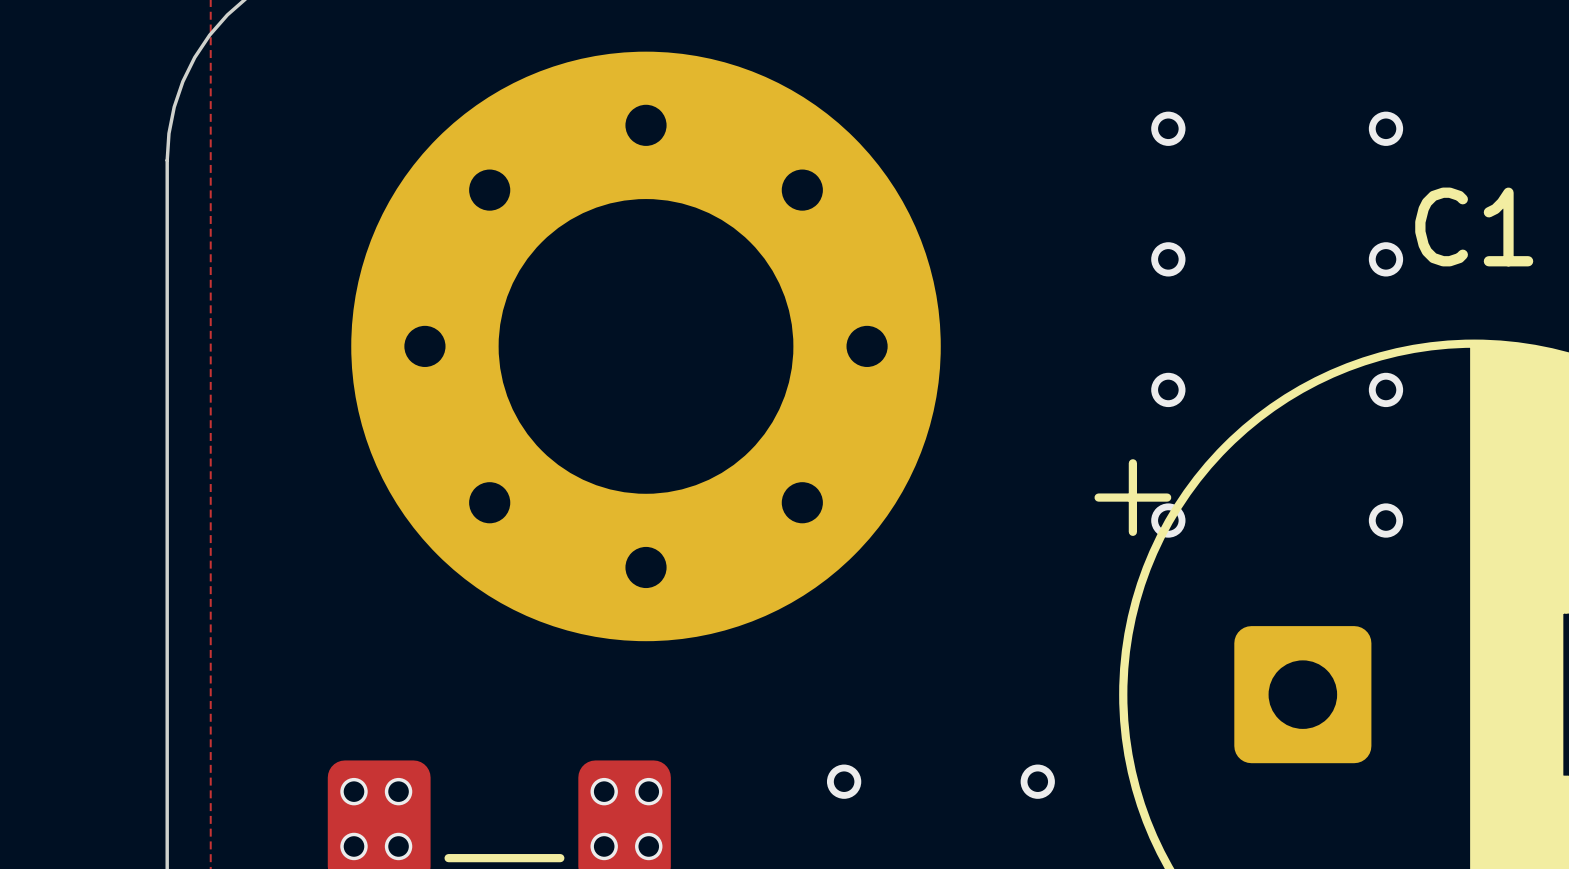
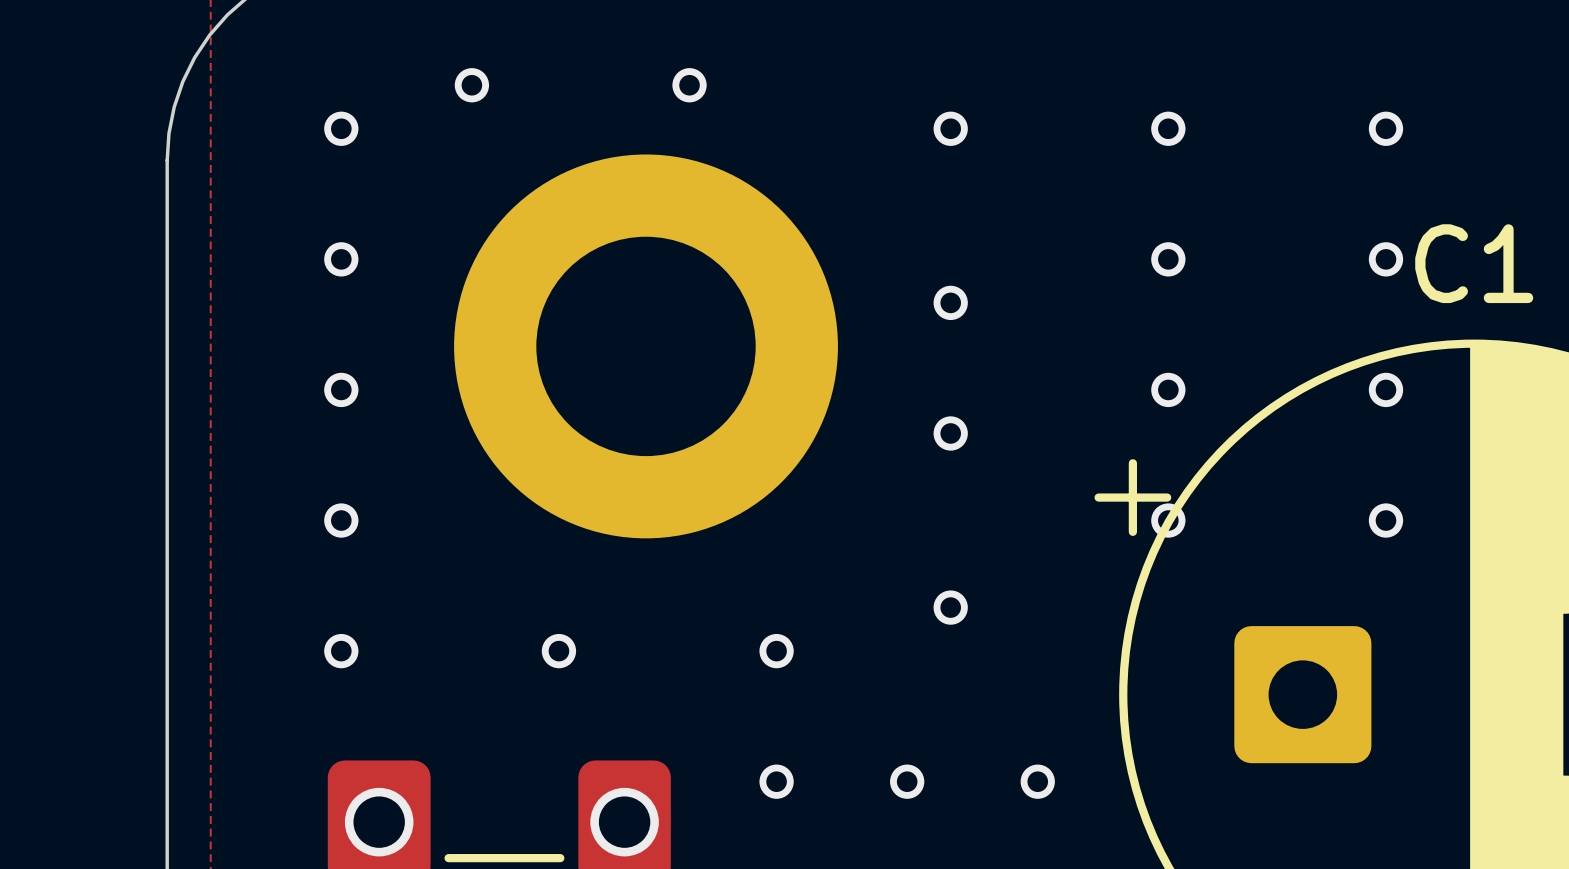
part footprint: [351, 51, 941, 642] -> [454, 154, 838, 539]
via: none -> (471, 85)
via: none -> (689, 85)
via: none -> (341, 128)
via: none -> (950, 128)
C1 name position: C1 (1474, 226) -> C1 (1474, 263)
via: none -> (341, 259)
via: none -> (950, 302)
via: none -> (341, 389)
via: none -> (950, 433)
via: none -> (341, 520)
via: none -> (950, 607)
via: none -> (341, 651)
via: none -> (558, 651)
via: none -> (776, 651)
via: none -> (776, 781)
via: (844, 781) -> none
via: none -> (907, 781)
via: (353, 791) -> none
via: (398, 791) -> none
via: (604, 791) -> none
via: (648, 791) -> none
via: none -> (379, 822)
via: none -> (624, 822)
via: (353, 846) -> none
via: (398, 846) -> none
via: (604, 846) -> none
via: (648, 846) -> none

